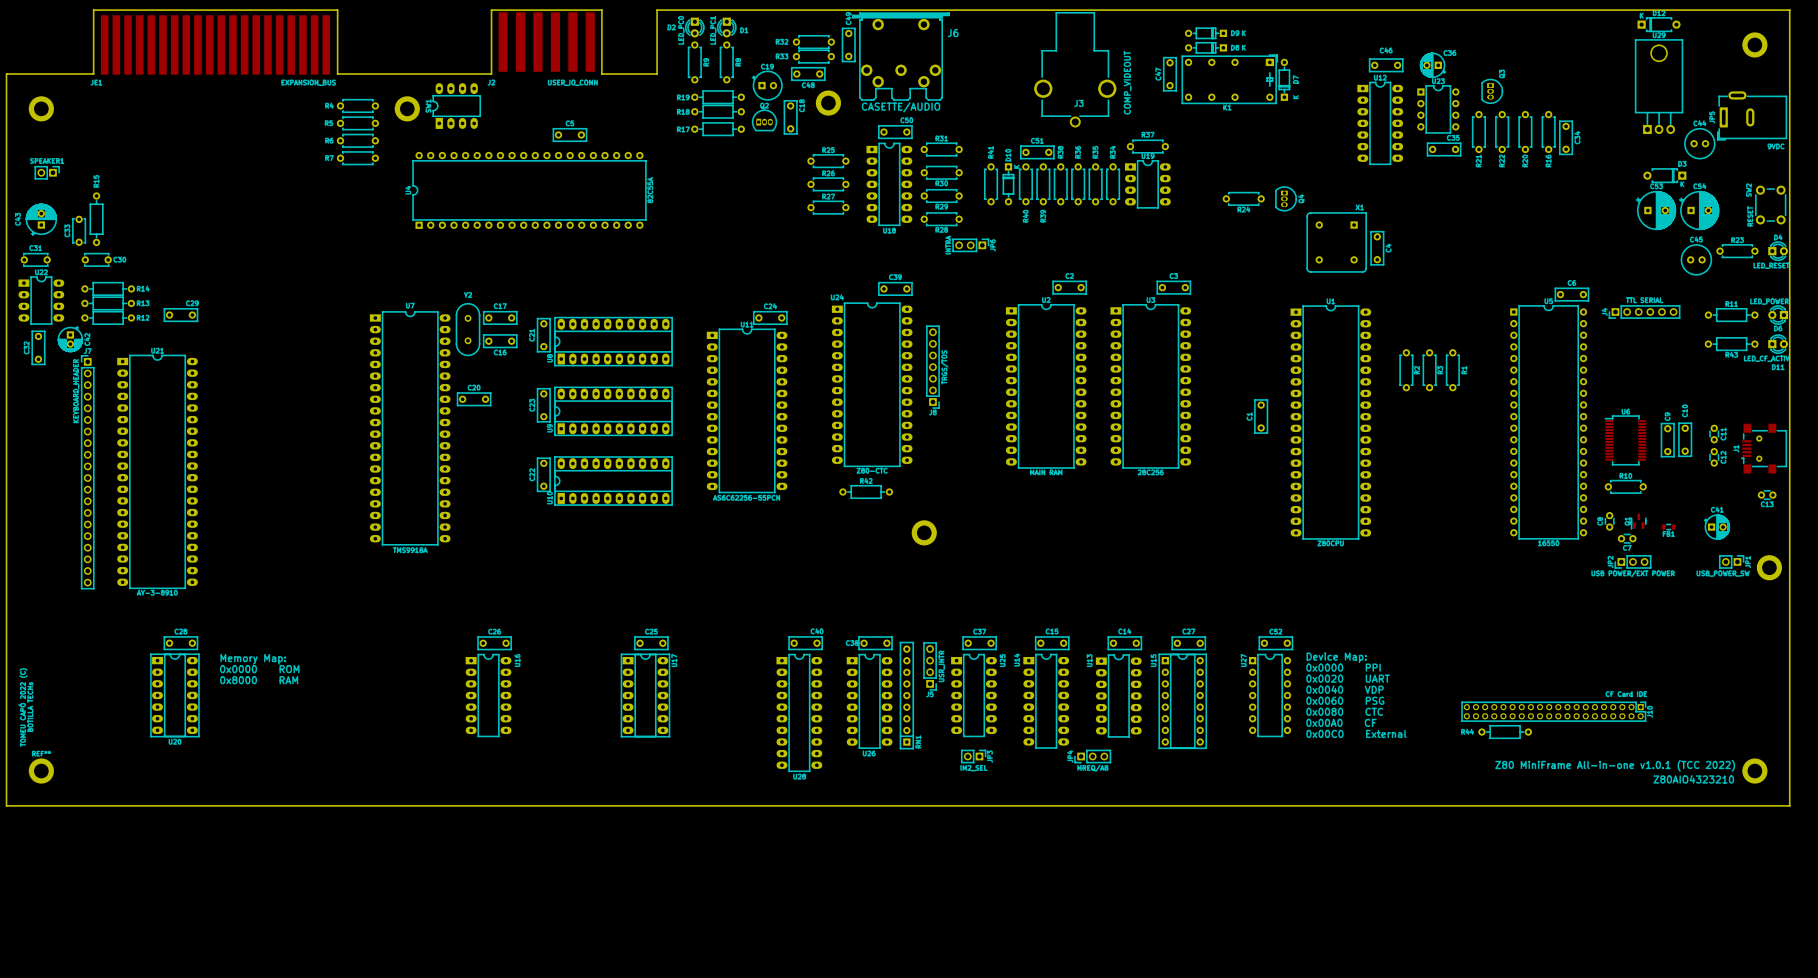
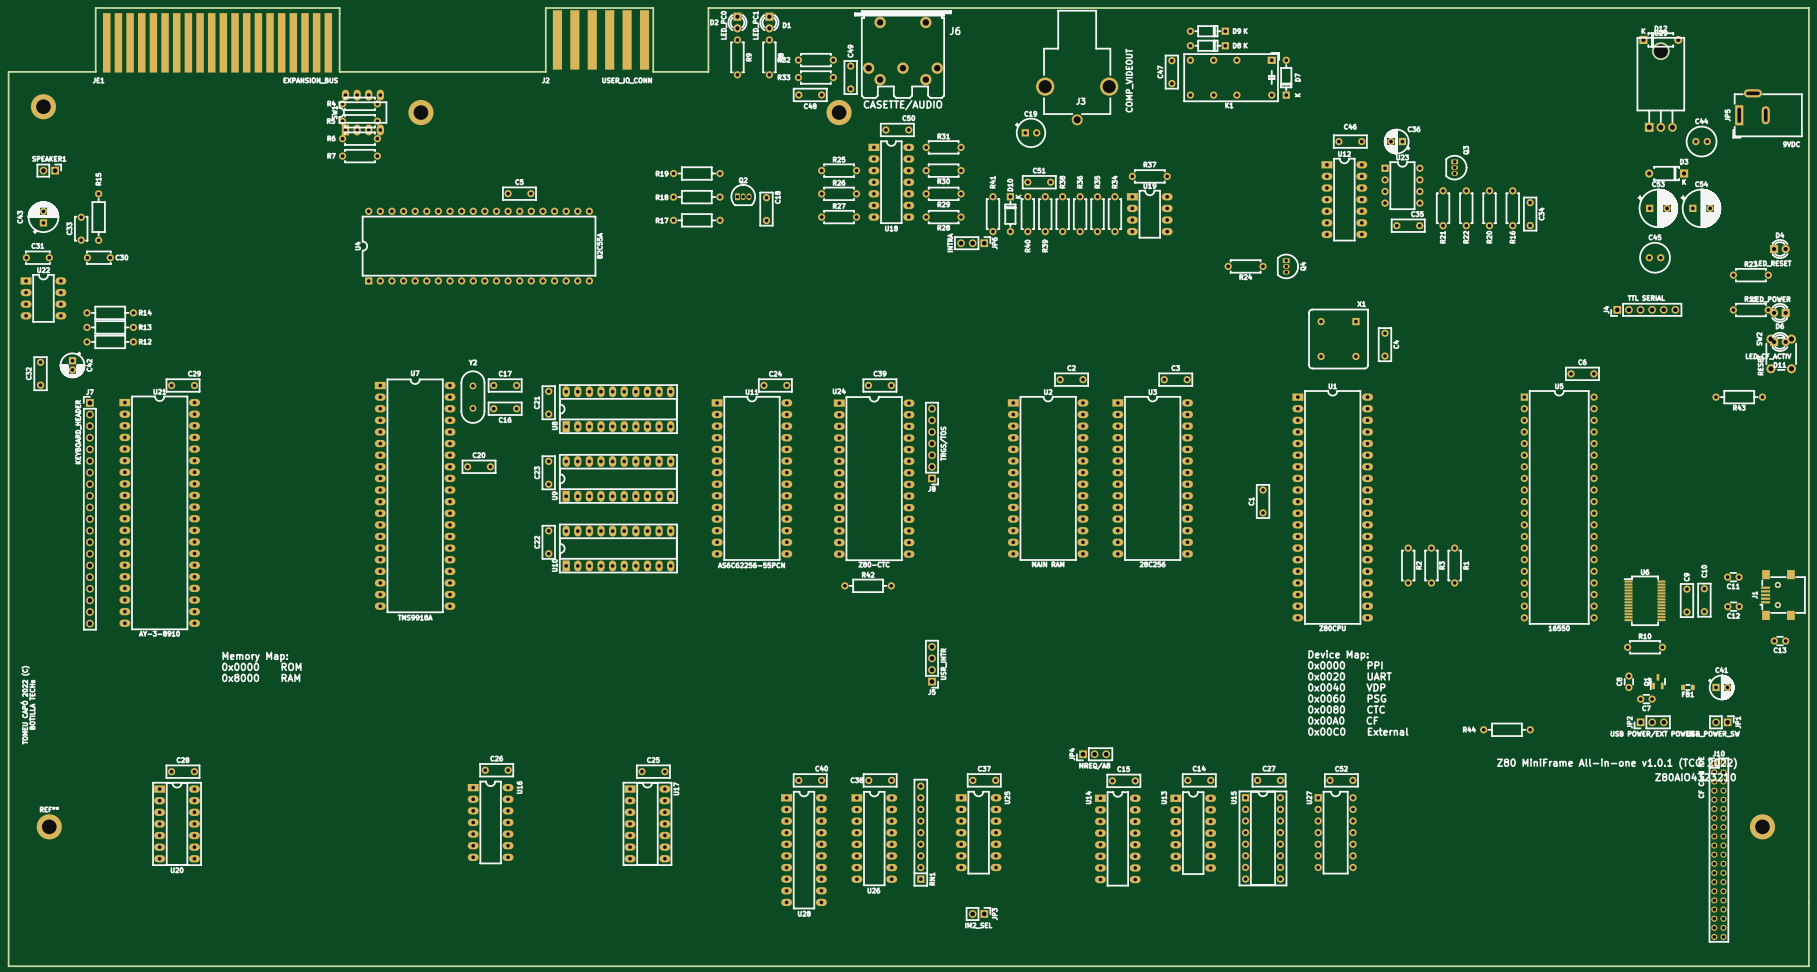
board edge: (543, 10) (491, 10) (491, 74) -> (545, 8) (545, 71) (493, 71)
board edge: (601, 10) (601, 74) (651, 74) -> (603, 8) (653, 8) (653, 71)
board edge: (706, 10) (657, 10) (657, 74) -> (708, 8) (708, 71) (659, 71)
board edge: (1789, 10) (1789, 805) (6, 805) -> (1791, 8) (1808, 8) (1808, 966) (8, 966) (8, 803)
part position: (1659, 24) -> (1660, 39)
part position: (694, 27) -> (737, 22)
part position: (726, 27) -> (769, 22)
part position: (546, 42) -> (600, 39)
part position: (813, 42) -> (815, 60)
part position: (848, 44) -> (850, 77)
part: (1754, 44) -> none
part position: (813, 56) -> (815, 77)
part position: (694, 62) -> (737, 57)
part position: (726, 62) -> (769, 57)
part position: (1386, 65) -> (1350, 141)
part position: (1432, 65) -> (1397, 141)
part position: (808, 74) -> (810, 94)
part position: (767, 85) -> (1030, 132)
part position: (1492, 91) -> (1456, 167)
part position: (718, 97) -> (696, 173)
part position: (828, 103) -> (839, 112)
part position: (456, 106) -> (362, 112)
part position: (407, 108) -> (420, 112)
part position: (1438, 109) -> (1402, 185)
part position: (718, 111) -> (696, 197)
part position: (1752, 115) -> (1767, 113)
part position: (790, 117) -> (766, 209)
part position: (764, 120) -> (743, 195)
part position: (1380, 123) -> (1344, 199)
part position: (718, 129) -> (696, 220)
part position: (1478, 132) -> (1443, 208)
part position: (1502, 132) -> (1466, 208)
part position: (1525, 132) -> (1489, 208)
part position: (1548, 132) -> (1512, 208)
part position: (569, 134) -> (519, 193)
part position: (1566, 137) -> (1530, 214)
part position: (1147, 146) -> (1149, 176)
part position: (1444, 149) -> (1408, 225)
part position: (1037, 152) -> (1039, 182)
part position: (828, 161) -> (839, 170)
part position: (828, 184) -> (839, 193)
part position: (991, 184) -> (992, 214)
part position: (1008, 184) -> (1010, 214)
part position: (1025, 184) -> (1027, 214)
part position: (1043, 184) -> (1045, 214)
part position: (1060, 184) -> (1062, 214)
part position: (1078, 184) -> (1080, 214)
part position: (1095, 184) -> (1097, 214)
part position: (1113, 184) -> (1114, 214)
part position: (1147, 184) -> (1149, 214)
part position: (529, 190) -> (479, 246)
part position: (1243, 198) -> (1245, 266)
part position: (1286, 198) -> (1287, 266)
part position: (1770, 205) -> (1781, 353)
part position: (828, 207) -> (839, 217)
part position: (1336, 242) -> (1338, 339)
part position: (1377, 248) -> (1384, 344)
part position: (1737, 251) -> (1750, 275)
part position: (1696, 259) -> (1655, 257)
part position: (1069, 287) -> (1071, 379)
part position: (1173, 287) -> (1175, 379)
part position: (108, 288) -> (110, 312)
part position: (895, 288) -> (879, 385)
part position: (1571, 294) -> (1582, 373)
part position: (108, 303) -> (110, 327)
part footprint: [1704, 308, 1759, 322] -> [1729, 303, 1772, 317]
part position: (180, 315) -> (183, 385)
part position: (108, 317) -> (110, 341)
part position: (500, 317) -> (505, 385)
part position: (770, 317) -> (775, 385)
part position: (468, 329) -> (472, 397)
part position: (543, 335) -> (548, 402)
part position: (70, 339) -> (72, 364)
part position: (500, 341) -> (505, 408)
part position: (613, 341) -> (618, 409)
part position: (1731, 344) -> (1739, 397)
part position: (38, 347) -> (40, 373)
part position: (932, 367) -> (932, 443)
part position: (1406, 370) -> (1408, 565)
part position: (1429, 370) -> (1431, 565)
part position: (1452, 370) -> (1454, 565)
part position: (872, 384) -> (874, 478)
part position: (1046, 386) -> (1048, 478)
part position: (1150, 386) -> (1152, 478)
part position: (474, 399) -> (479, 466)
part position: (543, 405) -> (548, 472)
part position: (747, 410) -> (751, 478)
part position: (613, 411) -> (618, 478)
part position: (1261, 416) -> (1263, 501)
part position: (1330, 422) -> (1332, 507)
part position: (1548, 422) -> (1559, 507)
part position: (410, 428) -> (415, 495)
part rotation: 0° (1714, 434) -> 90° clockwise (1733, 577)
part position: (1714, 434) -> (1733, 577)
part position: (1685, 439) -> (1704, 600)
part position: (1625, 440) -> (1644, 600)
part position: (1667, 440) -> (1686, 600)
part position: (1764, 448) -> (1782, 595)
part rotation: 0° (1714, 457) -> 90° clockwise (1733, 606)
part position: (1714, 457) -> (1733, 606)
part position: (157, 471) -> (159, 512)
part position: (87, 472) -> (89, 513)
part position: (543, 474) -> (548, 542)
part position: (613, 481) -> (618, 548)
part position: (1625, 486) -> (1645, 647)
part position: (866, 491) -> (868, 585)
part position: (1767, 495) -> (1779, 641)
part position: (1609, 521) -> (1628, 681)
part position: (1638, 521) -> (1657, 681)
part position: (1668, 527) -> (1687, 687)
part position: (1716, 527) -> (1721, 687)
part: (924, 532) -> none
part position: (1627, 538) -> (1646, 699)
part position: (1632, 561) -> (1652, 722)
part position: (1731, 561) -> (1721, 722)
part: (1769, 567) -> none
part position: (180, 643) -> (182, 771)
part position: (494, 643) -> (496, 770)
part position: (651, 643) -> (653, 771)
part position: (805, 643) -> (810, 780)
part position: (875, 643) -> (880, 780)
part position: (979, 643) -> (984, 780)
part position: (1052, 643) -> (1123, 780)
part position: (1124, 643) -> (1199, 780)
part position: (1188, 643) -> (1269, 780)
part position: (1275, 643) -> (1341, 780)
part position: (174, 695) -> (177, 823)
part position: (488, 695) -> (490, 822)
part position: (645, 695) -> (647, 823)
part position: (906, 695) -> (920, 832)
part position: (974, 695) -> (978, 832)
part position: (1118, 695) -> (1193, 833)
part position: (1270, 695) -> (1335, 832)
part position: (869, 701) -> (874, 838)
part position: (1046, 701) -> (1117, 838)
part position: (1182, 701) -> (1262, 838)
part rotation: 0° (1553, 711) -> 90° counterclockwise (1718, 850)
part position: (1553, 711) -> (1718, 850)
part position: (799, 712) -> (804, 850)
part position: (973, 756) -> (978, 913)
part position: (41, 771) -> (49, 826)
part position: (1754, 771) -> (1762, 826)

